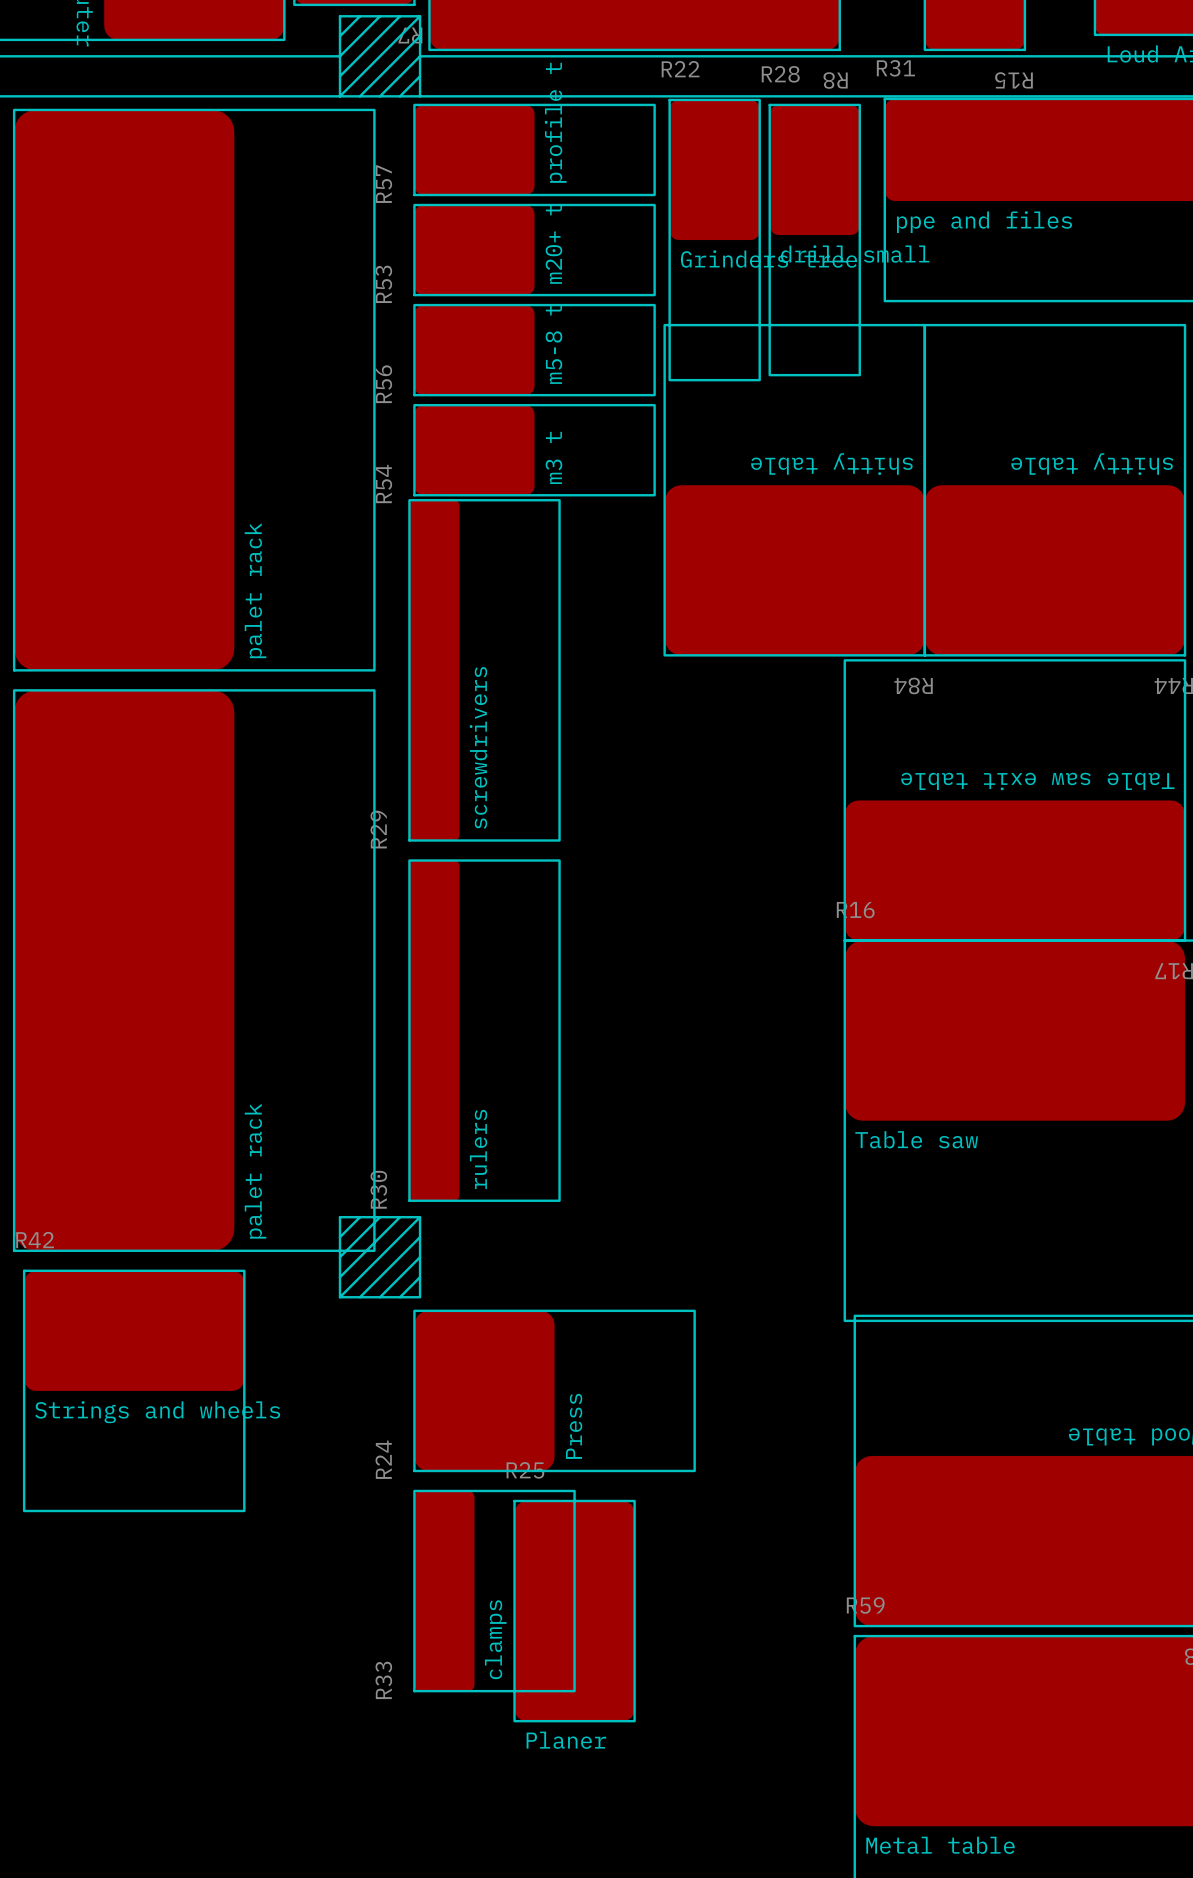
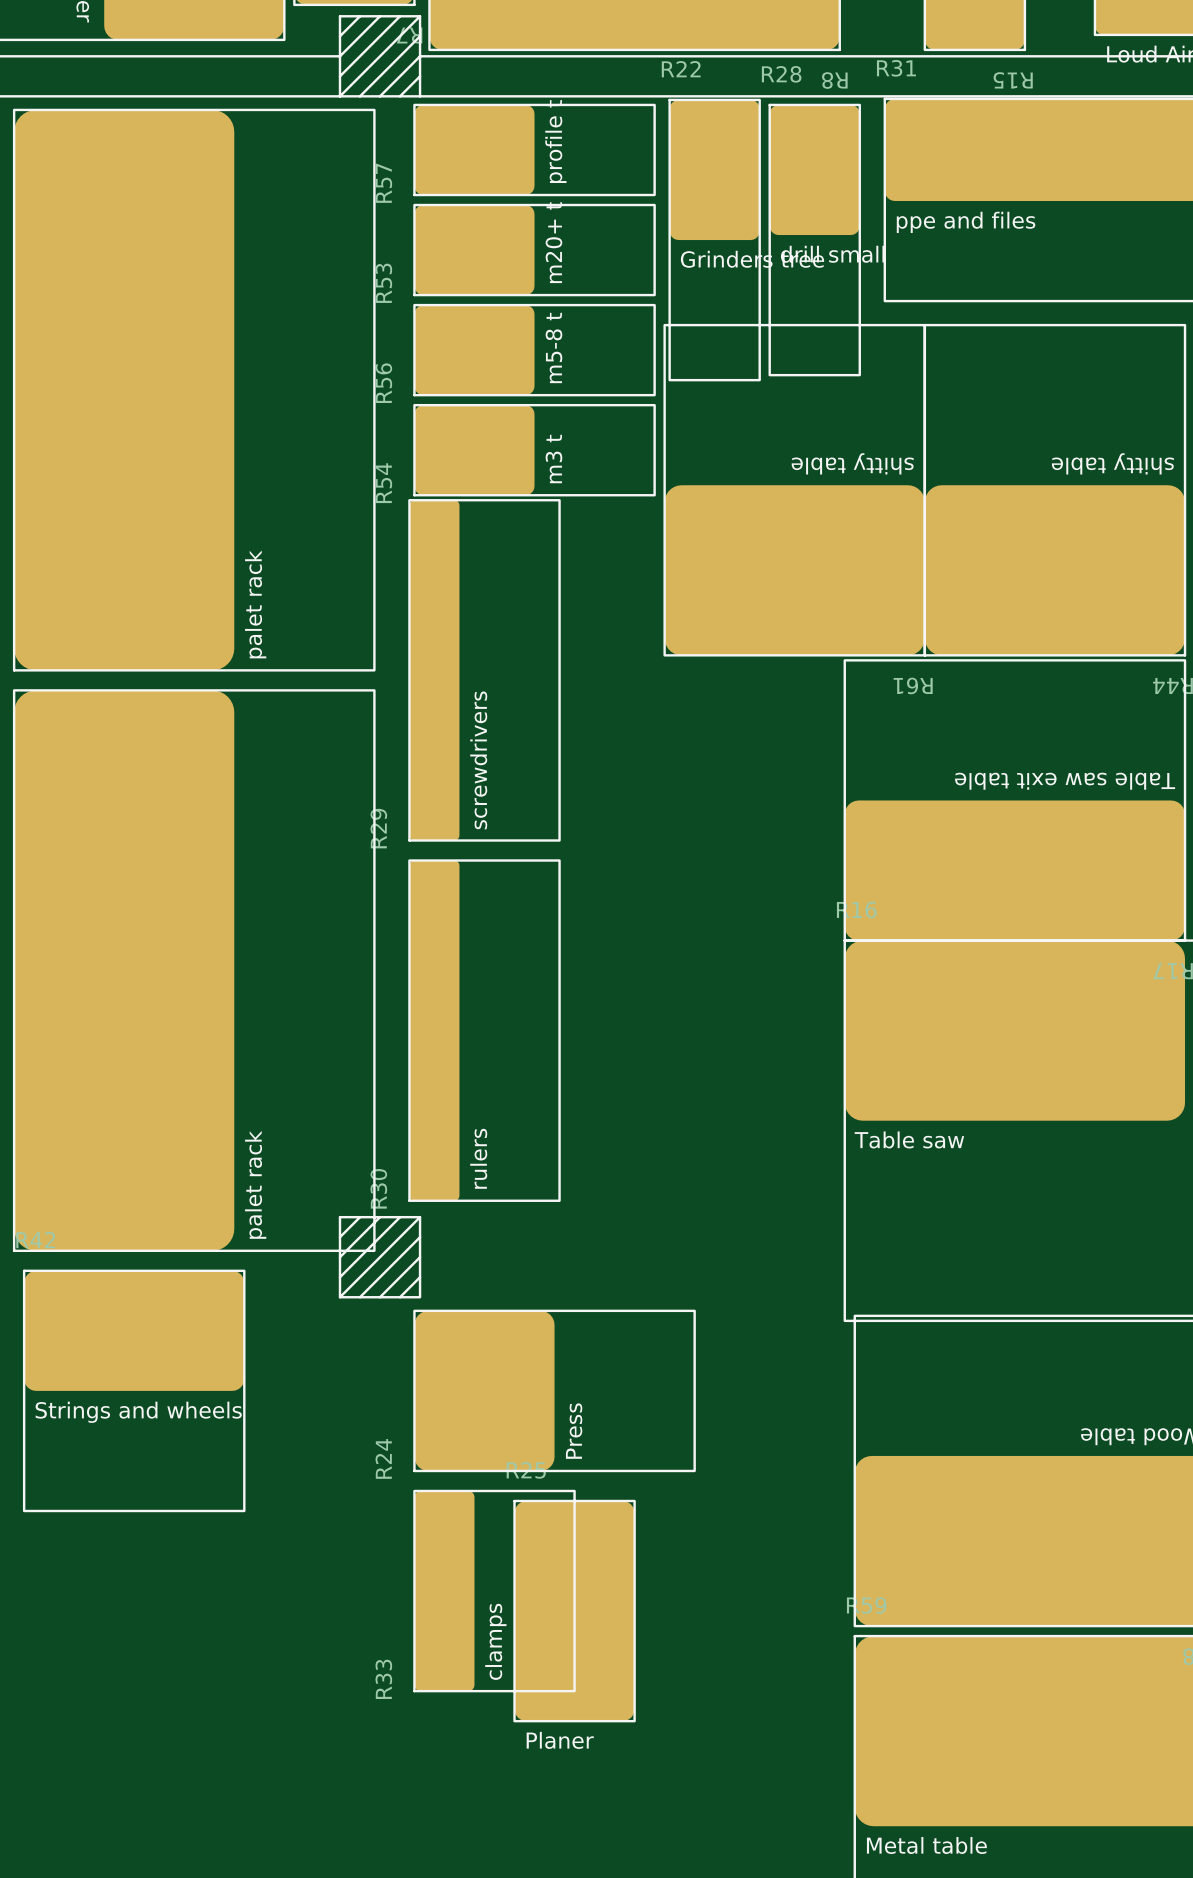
R84 name: R84 (913, 685) -> R61 (913, 685)

